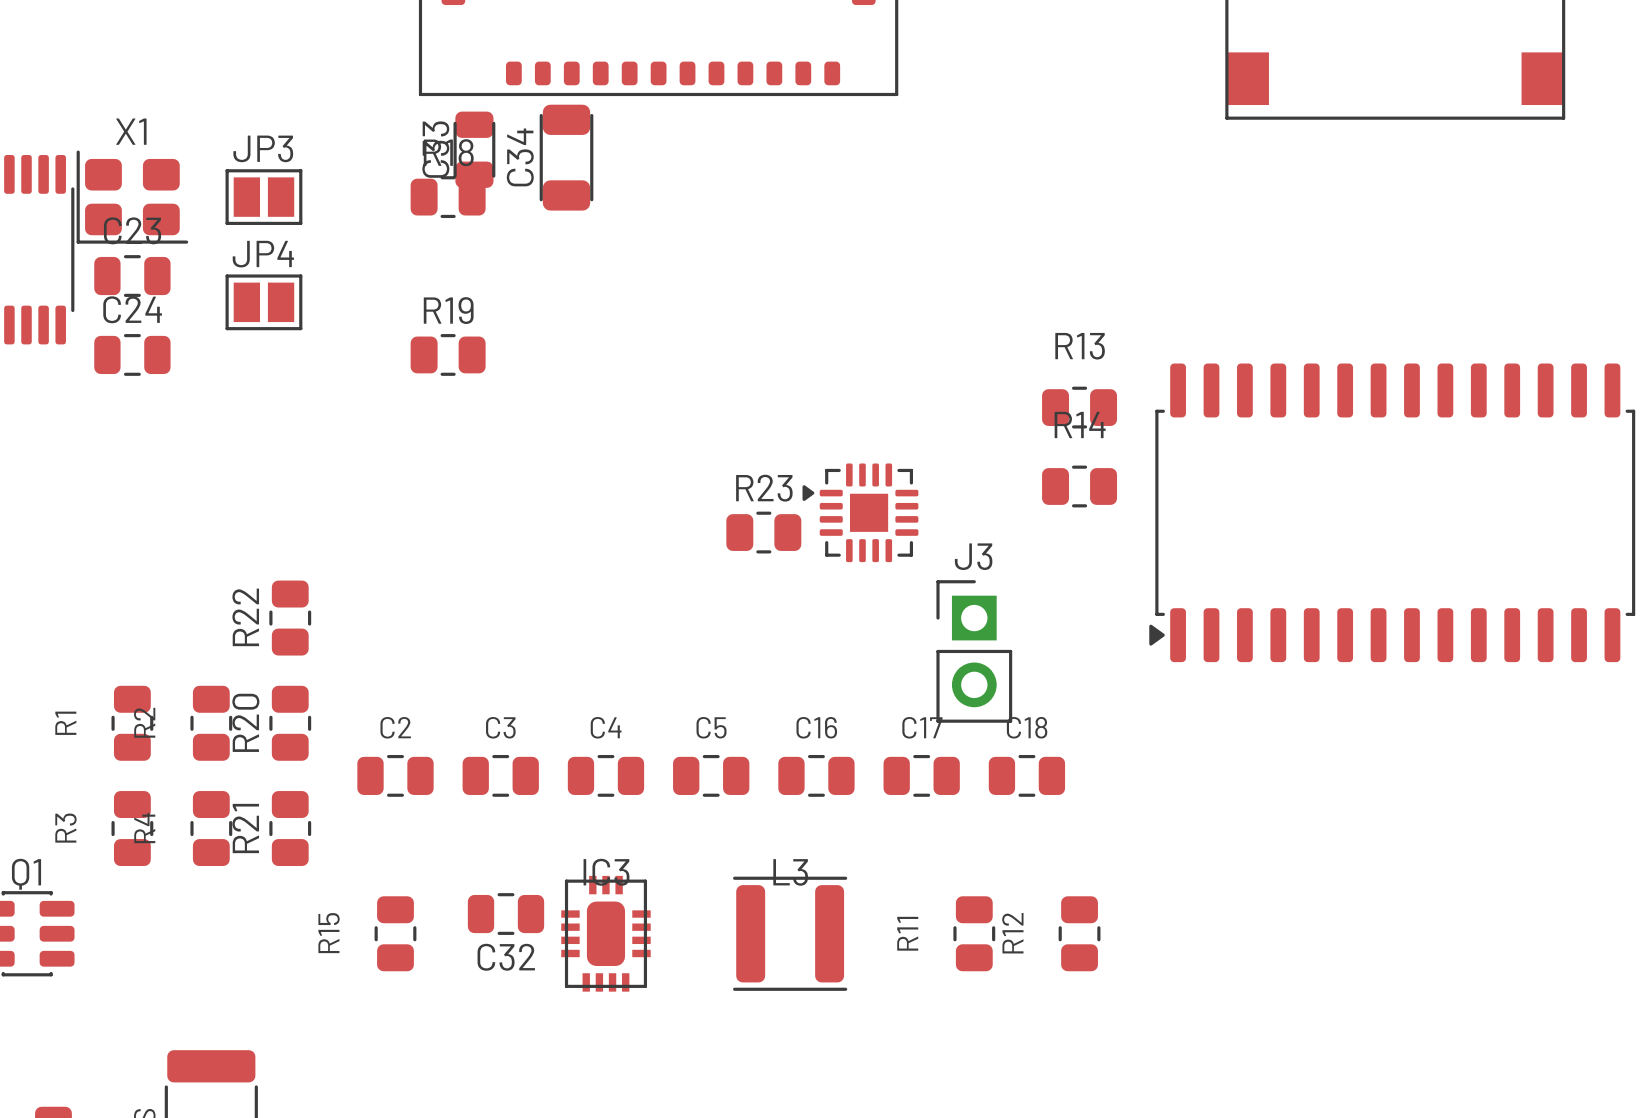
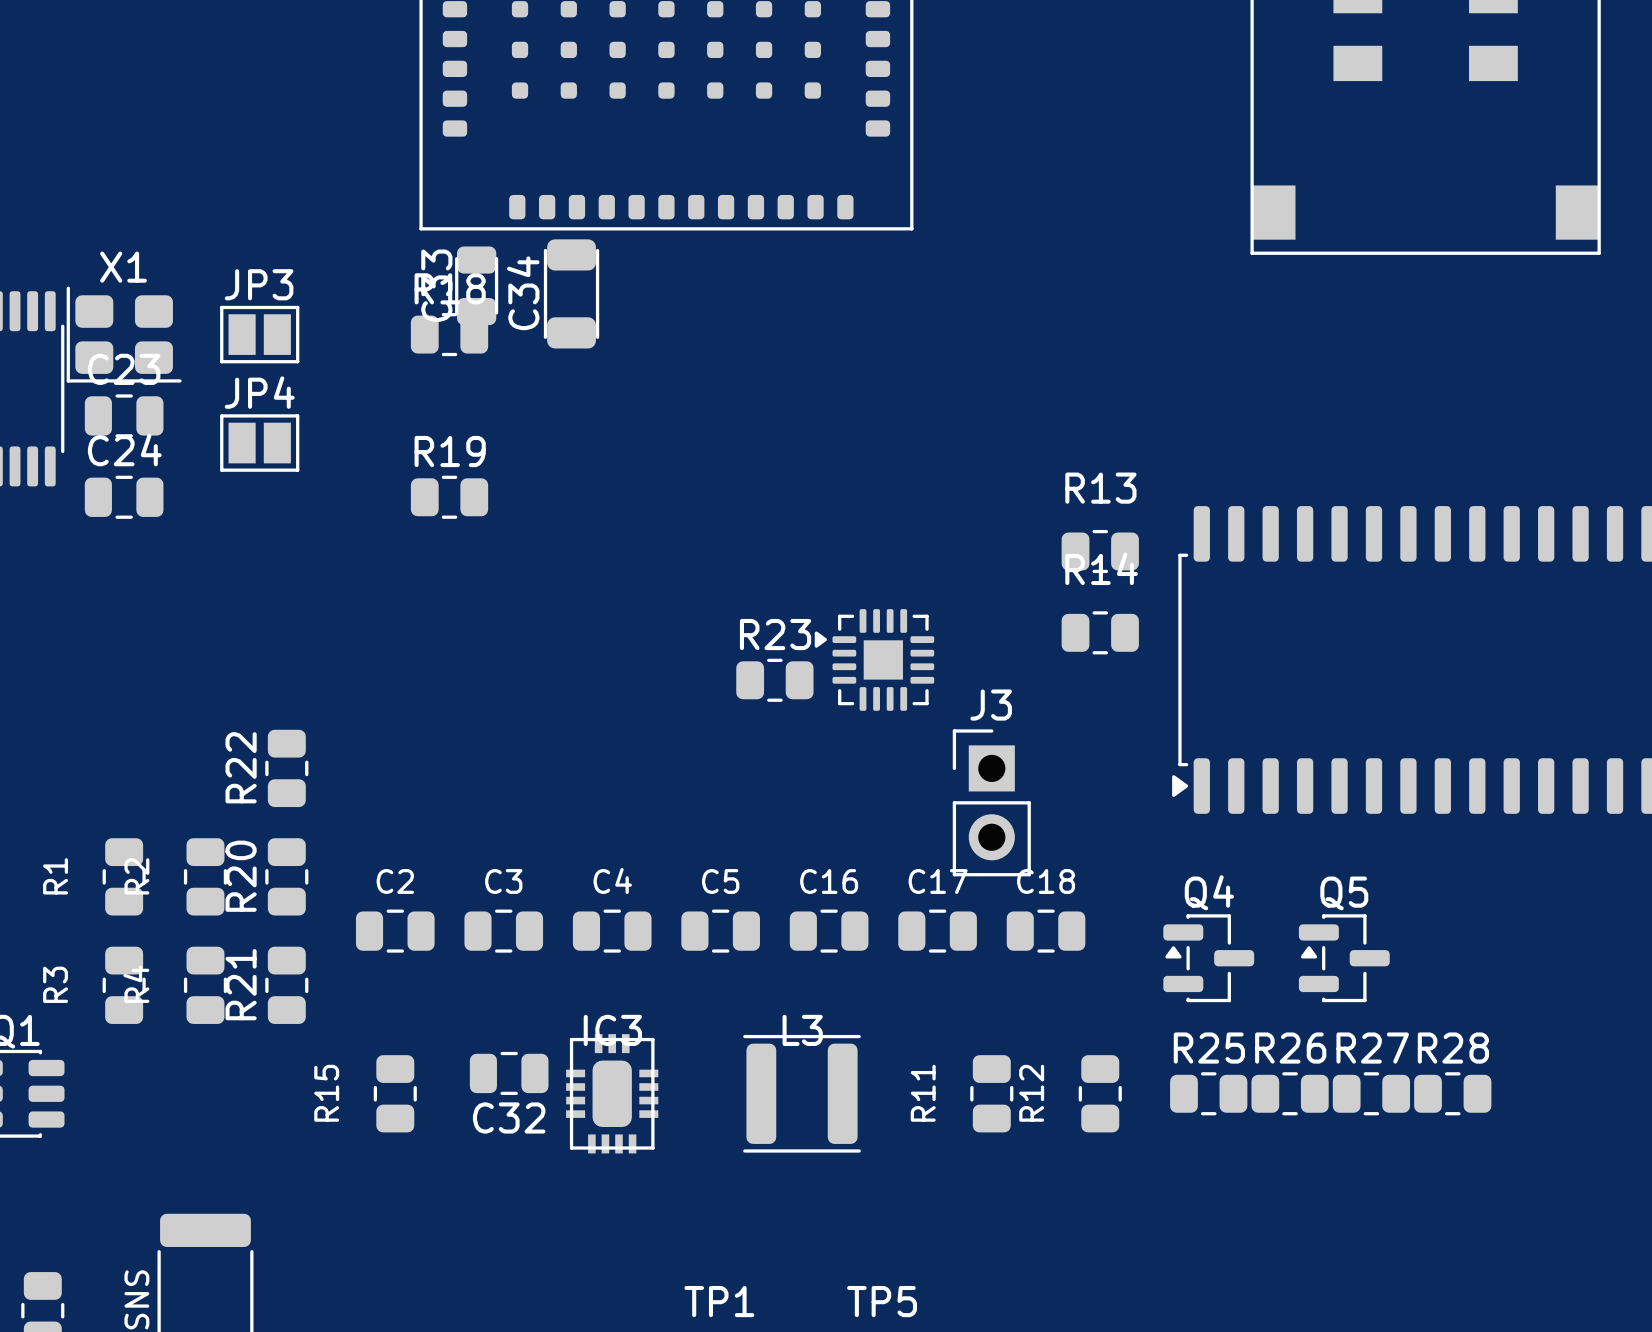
Q4: none -> (1208, 958)
Q5: none -> (1344, 958)
R25: none -> (1208, 1093)
R26: none -> (1290, 1093)
R27: none -> (1371, 1093)
R28: none -> (1452, 1093)

